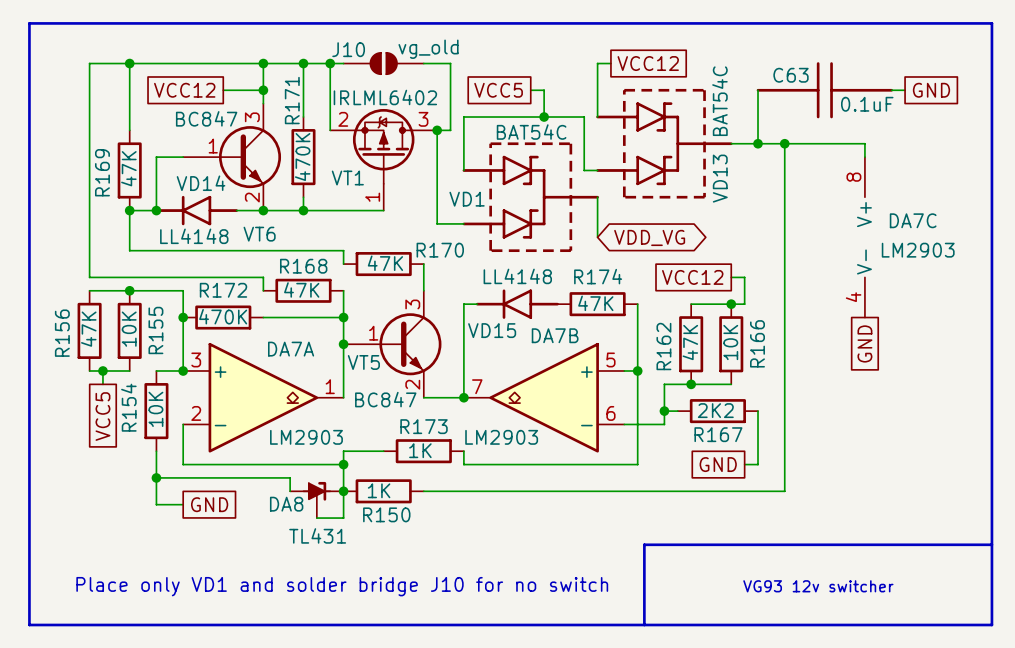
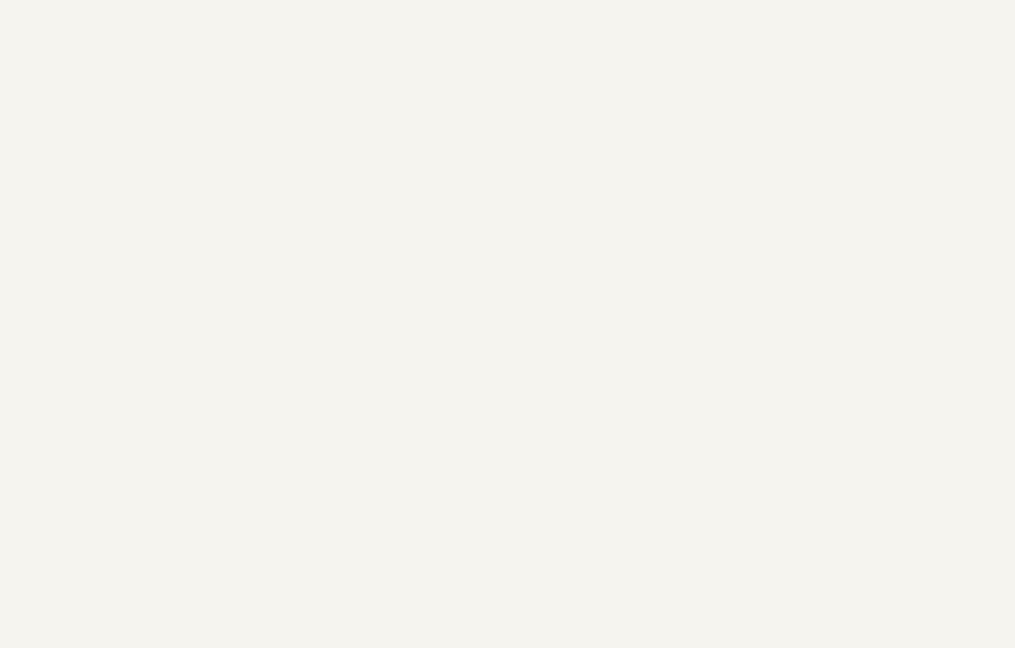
line: (29, 23) (991, 23) (991, 624) (29, 624) (29, 23) -> none
wire: (129, 63) (129, 130) -> none
junction: (129, 63) -> none
wire: (263, 63) (263, 103) -> none
junction: (263, 63) -> none
wire: (303, 63) (303, 117) -> none
junction: (303, 63) -> none
wire: (330, 63) (330, 130) -> none
junction: (330, 63) -> none
wire: (343, 63) (89, 63) (89, 277) (263, 277) (263, 290) -> none
J10: vg_old (383, 63) -> none
wire: (423, 63) (450, 63) (450, 130) (437, 130) (437, 223) (463, 223) -> none
wire: (610, 63) (597, 63) (597, 117) -> none
global label: VCC12 (648, 63) -> none
global label: VCC12 (184, 90) -> none
wire: (223, 90) (263, 90) -> none
junction: (263, 90) -> none
global label: VCC5 (498, 90) -> none
wire: (530, 90) (544, 90) (544, 117) -> none
wire: (758, 90) (758, 143) -> none
C63: 0.1uF (824, 90) -> none
wire: (891, 90) (905, 90) -> none
global label: GND (931, 90) -> none
junction: (544, 117) -> none
junction: (437, 130) -> none
VD13: BAT54C (664, 143) -> none
wire: (731, 143) (864, 143) (864, 157) -> none
junction: (758, 143) -> none
wire: (784, 143) (784, 491) (423, 491) -> none
junction: (784, 143) -> none
wire: (183, 157) (156, 157) (156, 210) (129, 210) (129, 250) (343, 250) (343, 264) -> none
VT6: BC847 (232, 157) -> none
R171: 470K (303, 157) -> none
VT1: IRLML6402 (383, 159) -> none
R169: 47K (129, 170) -> none
wire: (463, 170) (463, 117) (584, 117) (584, 170) (597, 170) -> none
wire: (303, 197) (303, 210) -> none
VD1: BAT54C (530, 197) -> none
wire: (597, 197) (597, 237) -> none
junction: (129, 210) -> none
junction: (156, 210) -> none
VD14: LL4148 (196, 210) -> none
wire: (236, 210) (383, 210) -> none
junction: (263, 210) -> none
junction: (303, 210) -> none
global label: VDD_VG (649, 237) -> none
DA7C: LM2903 (864, 237) -> none
R170: 47K (383, 264) -> none
wire: (423, 264) (423, 290) -> none
global label: VCC12 (692, 277) -> none
wire: (731, 277) (744, 277) (744, 304) (691, 304) -> none
wire: (89, 290) (183, 290) (183, 370) (156, 370) -> none
junction: (129, 290) -> none
R168: 47K (303, 290) -> none
wire: (343, 290) (343, 397) -> none
wire: (477, 304) (463, 304) (463, 397) (423, 397) -> none
VD15: LL4148 (517, 304) -> none
R174: 47K (597, 304) -> none
wire: (637, 304) (637, 464) (463, 464) (463, 451) -> none
junction: (731, 304) -> none
junction: (183, 317) -> none
R172: 470K (223, 317) -> none
wire: (263, 317) (343, 317) -> none
junction: (343, 317) -> none
R156: 47K (89, 330) -> none
R155: 10K (129, 330) -> none
global label: GND (864, 343) -> none
junction: (343, 344) -> none
VT5: BC847 (392, 344) -> none
R162: 47K (691, 344) -> none
R166: 10K (731, 344) -> none
wire: (89, 370) (129, 370) -> none
wire: (102, 370) (102, 384) -> none
junction: (102, 370) -> none
junction: (183, 370) -> none
wire: (624, 370) (637, 370) -> none
junction: (637, 370) -> none
junction: (691, 384) -> none
wire: (731, 384) (664, 384) (664, 424) (624, 424) -> none
DA7A: LM2903 (263, 397) -> none
junction: (463, 397) -> none
DA7B: LM2903 (544, 397) -> none
R154: 10K (156, 411) -> none
wire: (664, 411) (677, 411) -> none
junction: (664, 411) -> none
R167: 2K2 (717, 411) -> none
wire: (758, 411) (758, 464) (744, 464) -> none
global label: VCC5 (102, 416) -> none
wire: (183, 424) (183, 464) (343, 464) -> none
wire: (156, 451) (156, 504) (183, 504) -> none
wire: (383, 451) (343, 451) (343, 518) (316, 518) -> none
R173: 1K (423, 451) -> none
junction: (343, 464) -> none
global label: GND (718, 464) -> none
wire: (156, 477) (290, 477) (290, 491) -> none
junction: (156, 477) -> none
junction: (343, 491) -> none
R150: 1K (383, 491) -> none
DA8: TL431 (316, 500) -> none
global label: GND (209, 504) -> none
line: (991, 544) (644, 544) (644, 624) -> none
text: Place only VD1 and solder bridge J10 for no switch (342, 586) -> none
text: VG93 12v switcher (818, 586) -> none

